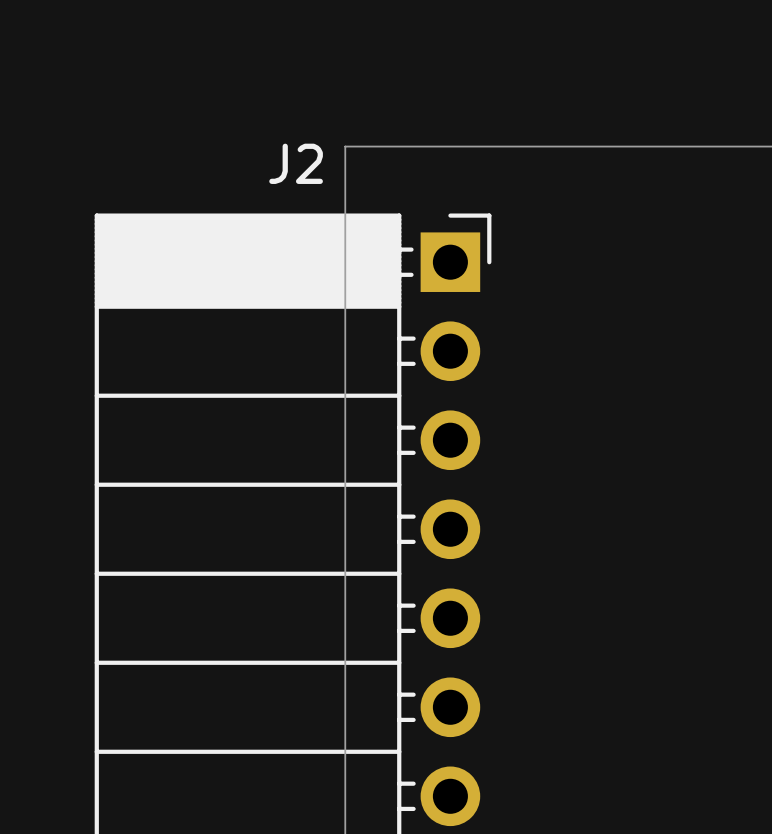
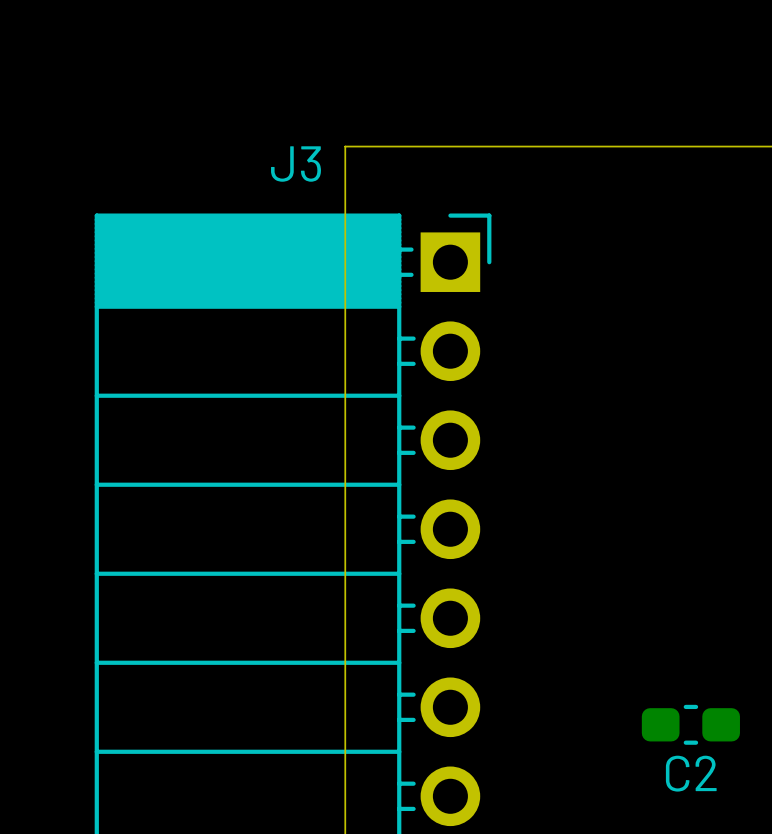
J2 name: J2 (296, 163) -> J3 (296, 164)
C2: none -> (690, 724)

